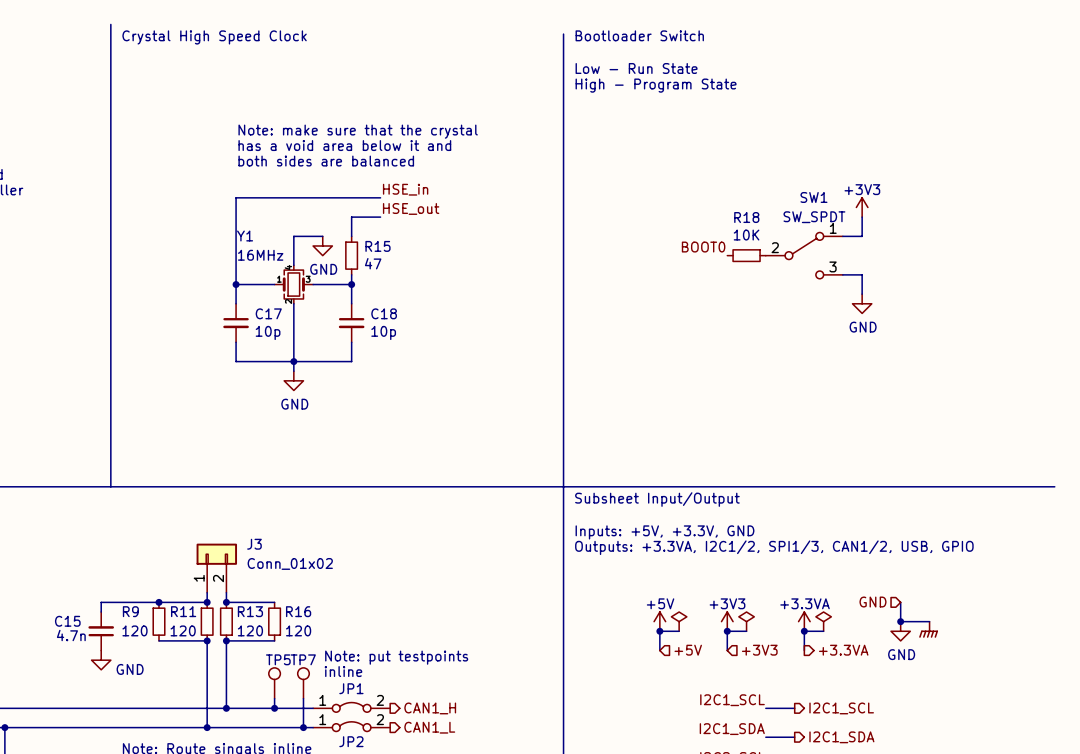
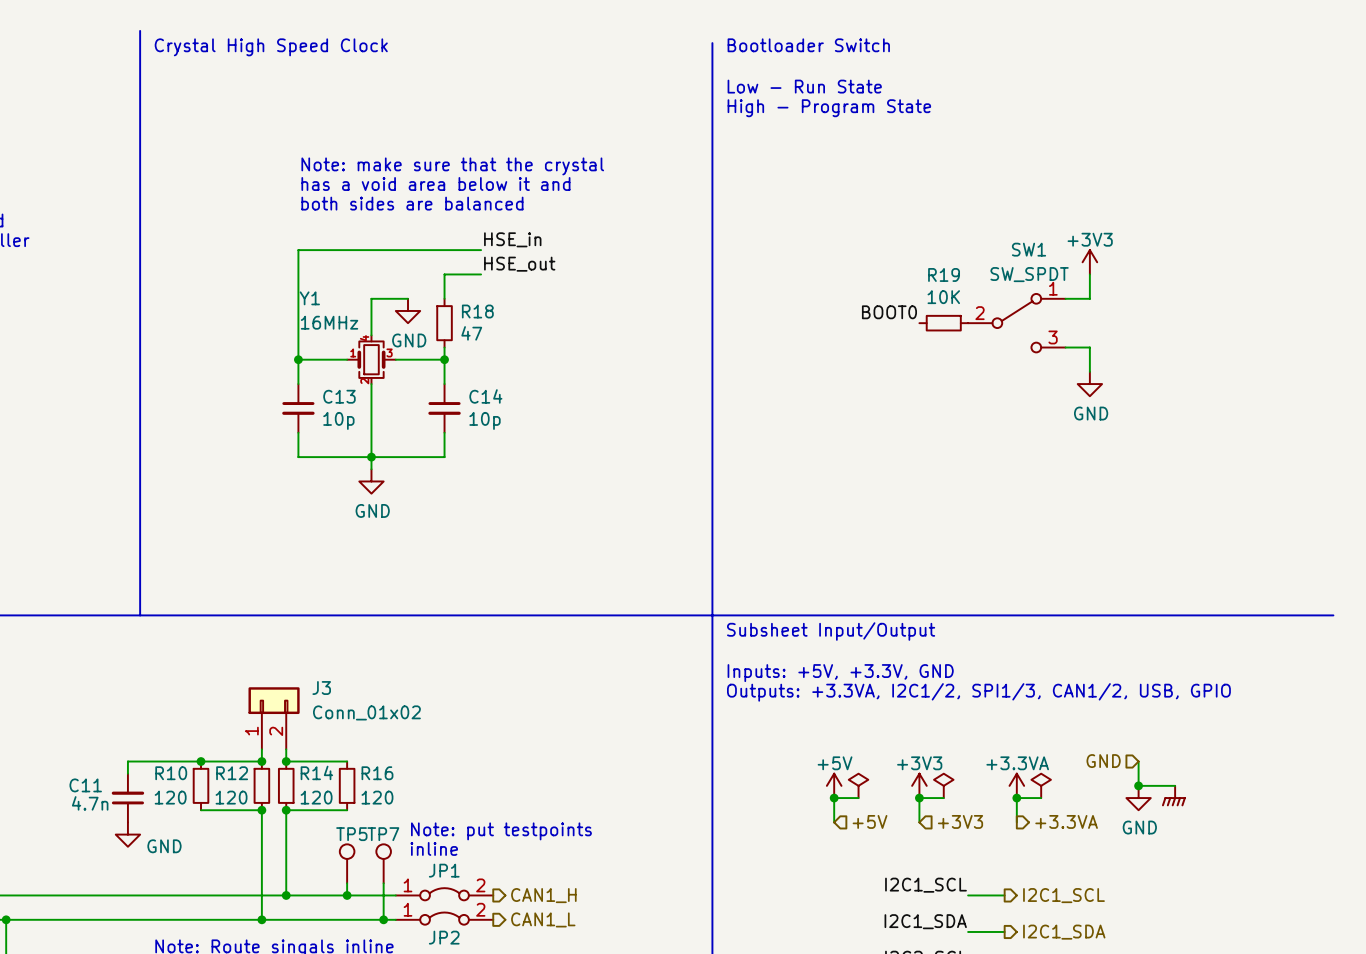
R18 name: R18 (746, 217) -> R19 (944, 274)
R15 name: R15 (377, 246) -> R18 (477, 311)
C17 name: C17 (268, 313) -> C13 (339, 396)
C18 name: C18 (384, 313) -> C14 (485, 396)
R9 name: R9 (130, 611) -> R10 (171, 773)
R11 name: R11 (183, 611) -> R12 (232, 773)
R13 name: R13 (250, 611) -> R14 (316, 772)
C15 name: C15 (67, 621) -> C11 (85, 785)

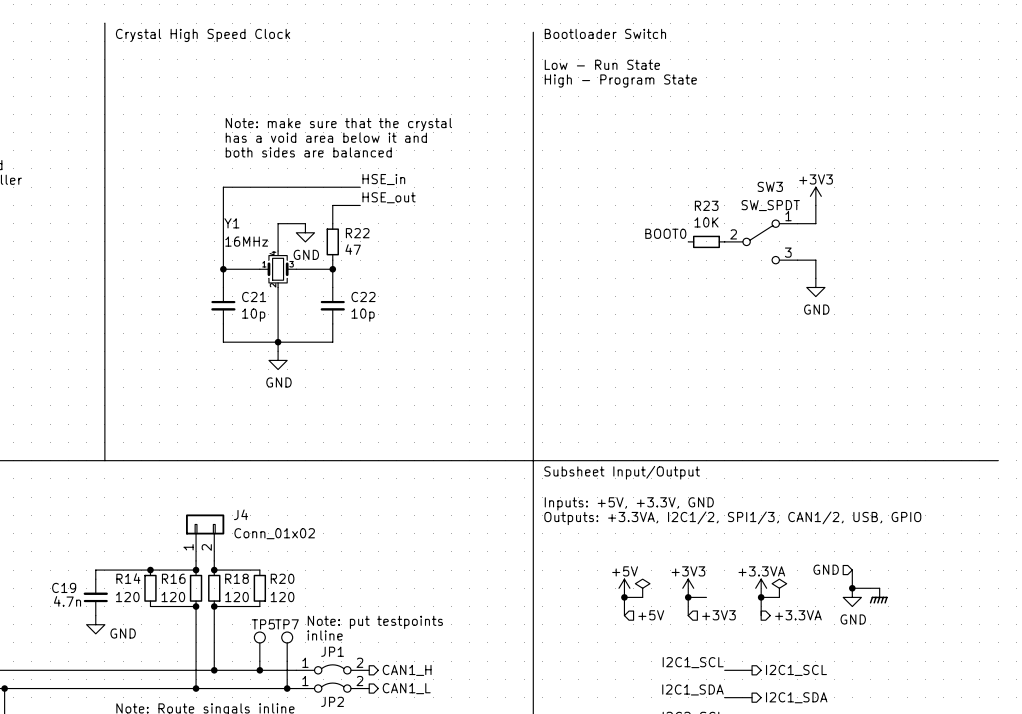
SW1 name: SW1 (1029, 249) -> SW3 (770, 186)
R19 name: R19 (944, 274) -> R23 (706, 205)
R18 name: R18 (477, 311) -> R22 (357, 233)
C13 name: C13 (339, 396) -> C21 (254, 296)
C14 name: C14 (485, 396) -> C22 (363, 296)
J3 name: J3 (321, 688) -> J4 (241, 514)
R14 name: R14 (316, 772) -> R18 (236, 578)
R10 name: R10 (171, 773) -> R14 (128, 578)
R12 name: R12 (232, 773) -> R16 (173, 578)
R16 name: R16 (377, 773) -> R20 (282, 578)
C11 name: C11 (85, 785) -> C19 (64, 587)
power symbol: (943, 785) -> none

